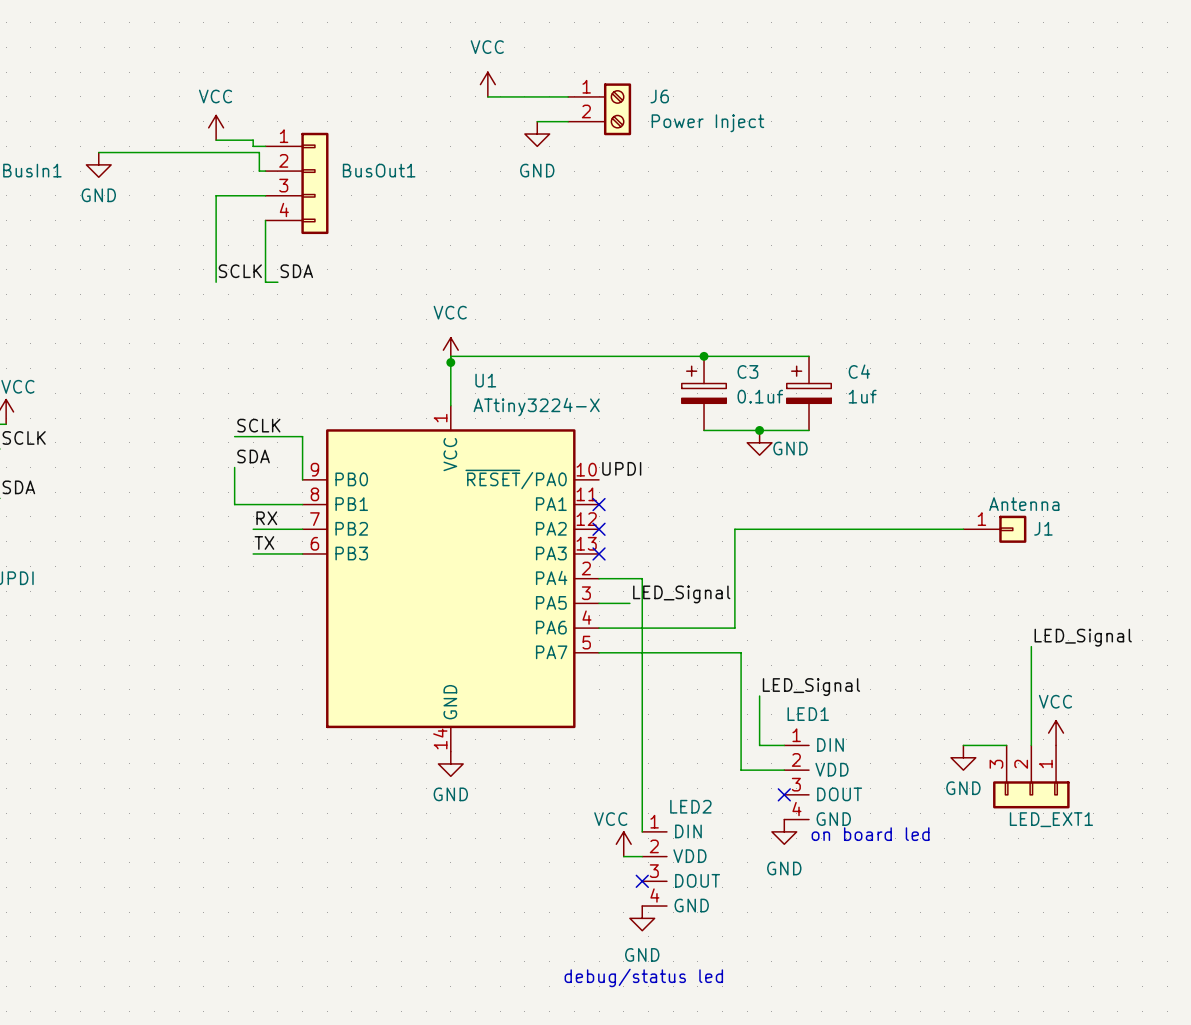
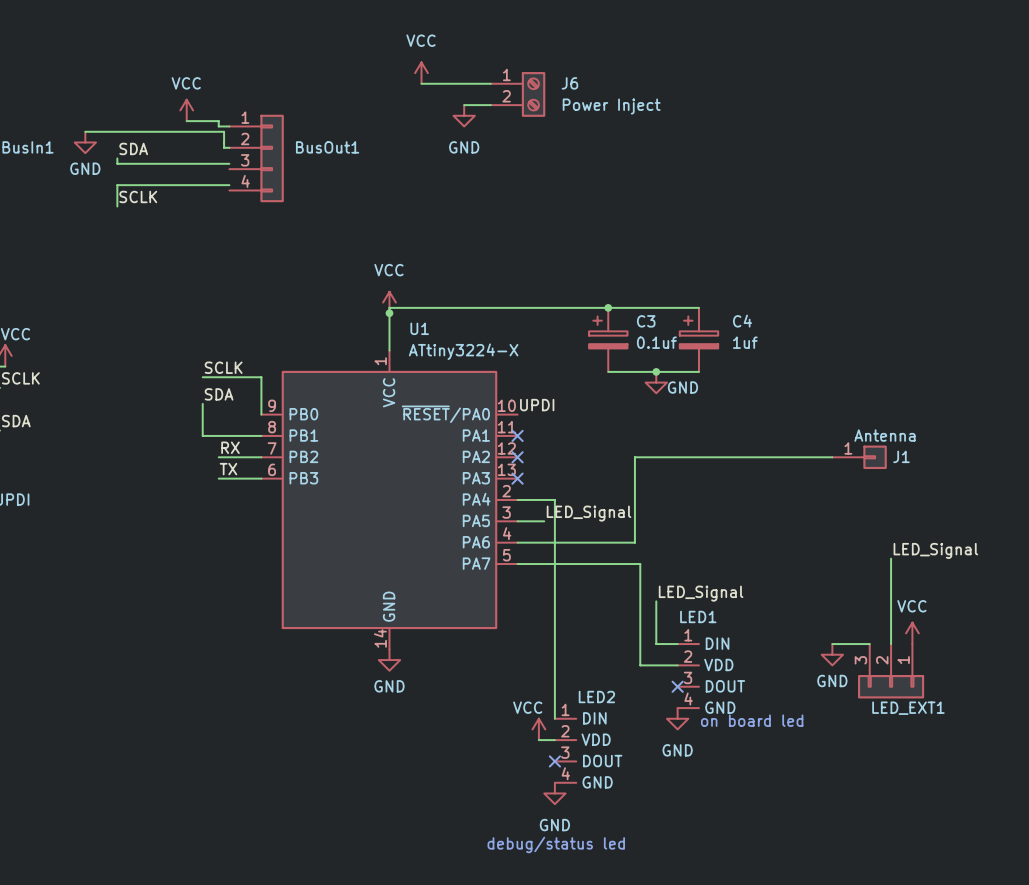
wire: none -> (117, 158) (117, 163) (229, 163)
wire: (265, 195) (216, 195) (216, 282) -> none
wire: none -> (229, 185) (117, 185) (117, 206)
wire: (265, 220) (265, 282) (277, 282) -> none
label position: SCLK (240, 271) -> SCLK (138, 196)
label position: SDA (296, 271) -> SDA (133, 148)

